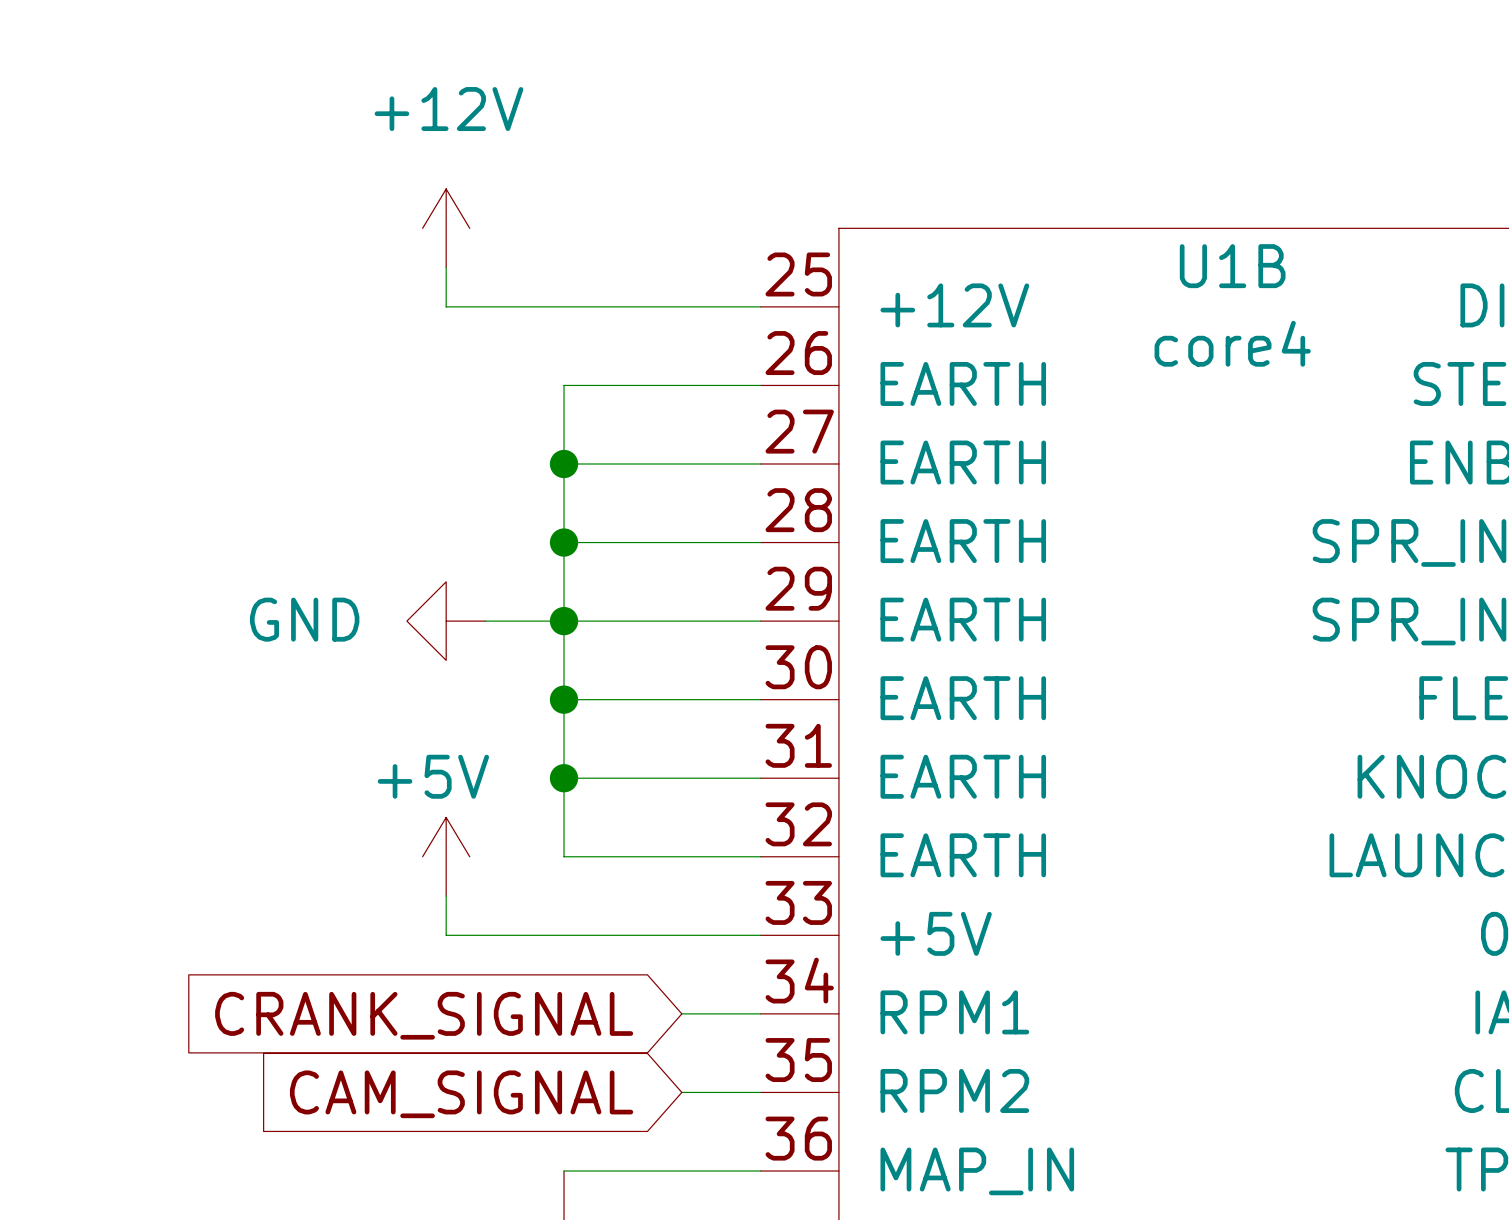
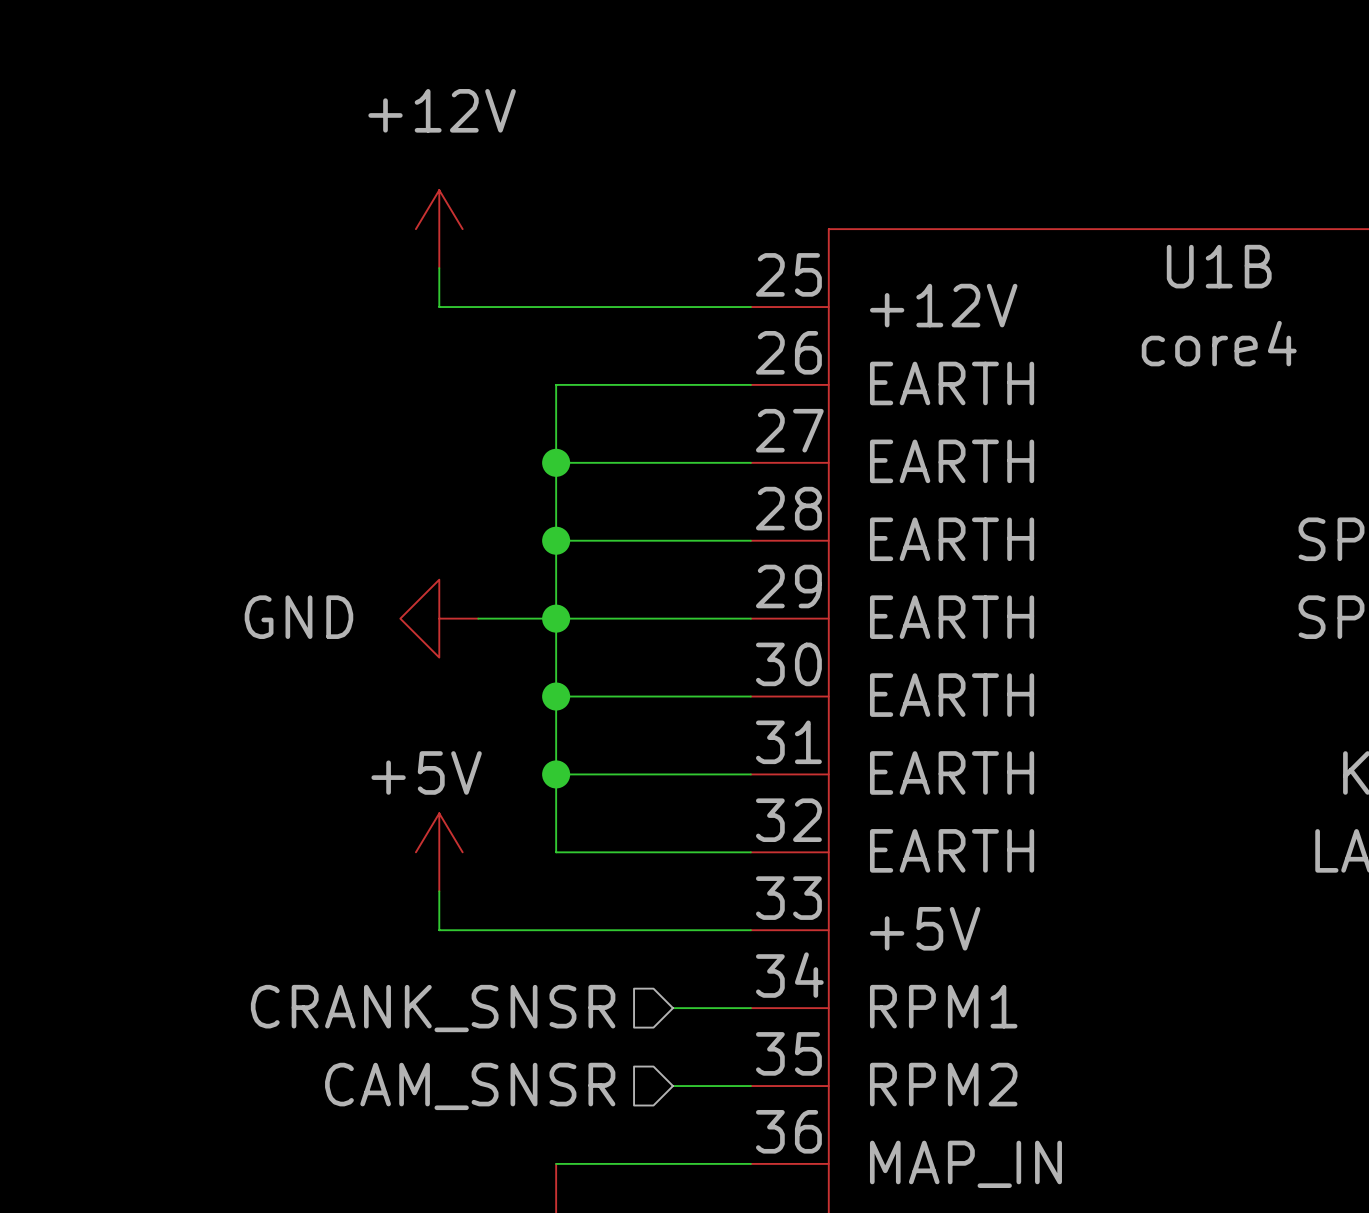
hierarchical label: none -> CRANK_SNSR (433, 1008)
global label: CRANK_SIGNAL (424, 1015) -> none
hierarchical label: none -> CAM_SNSR (470, 1086)
global label: CAM_SIGNAL (461, 1094) -> none

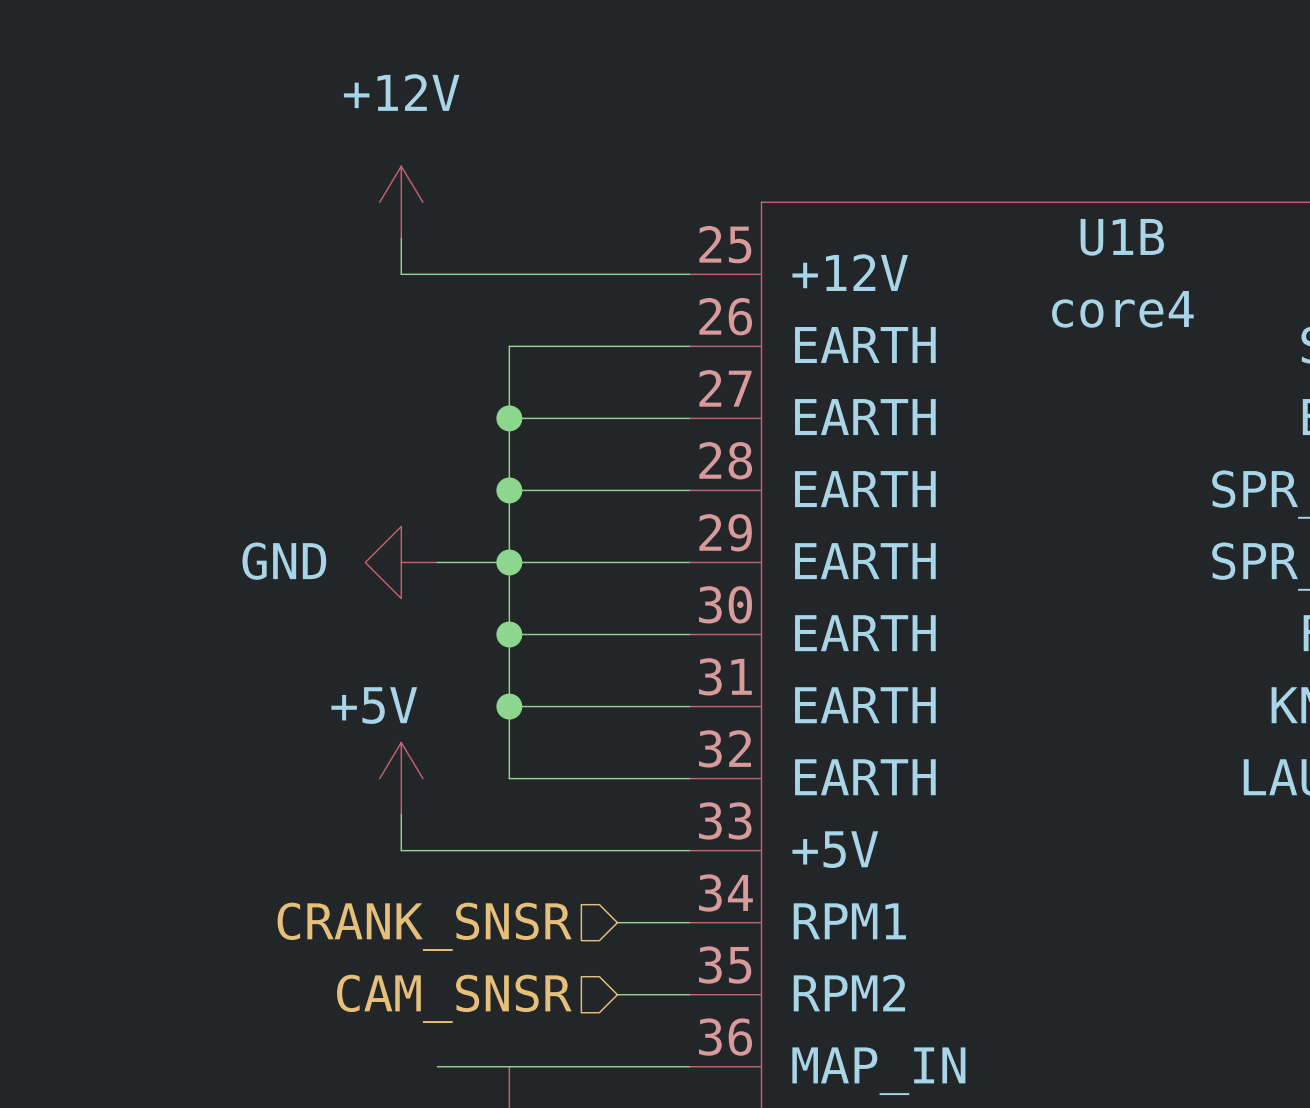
wire: none -> (437, 1066) (509, 1066)

